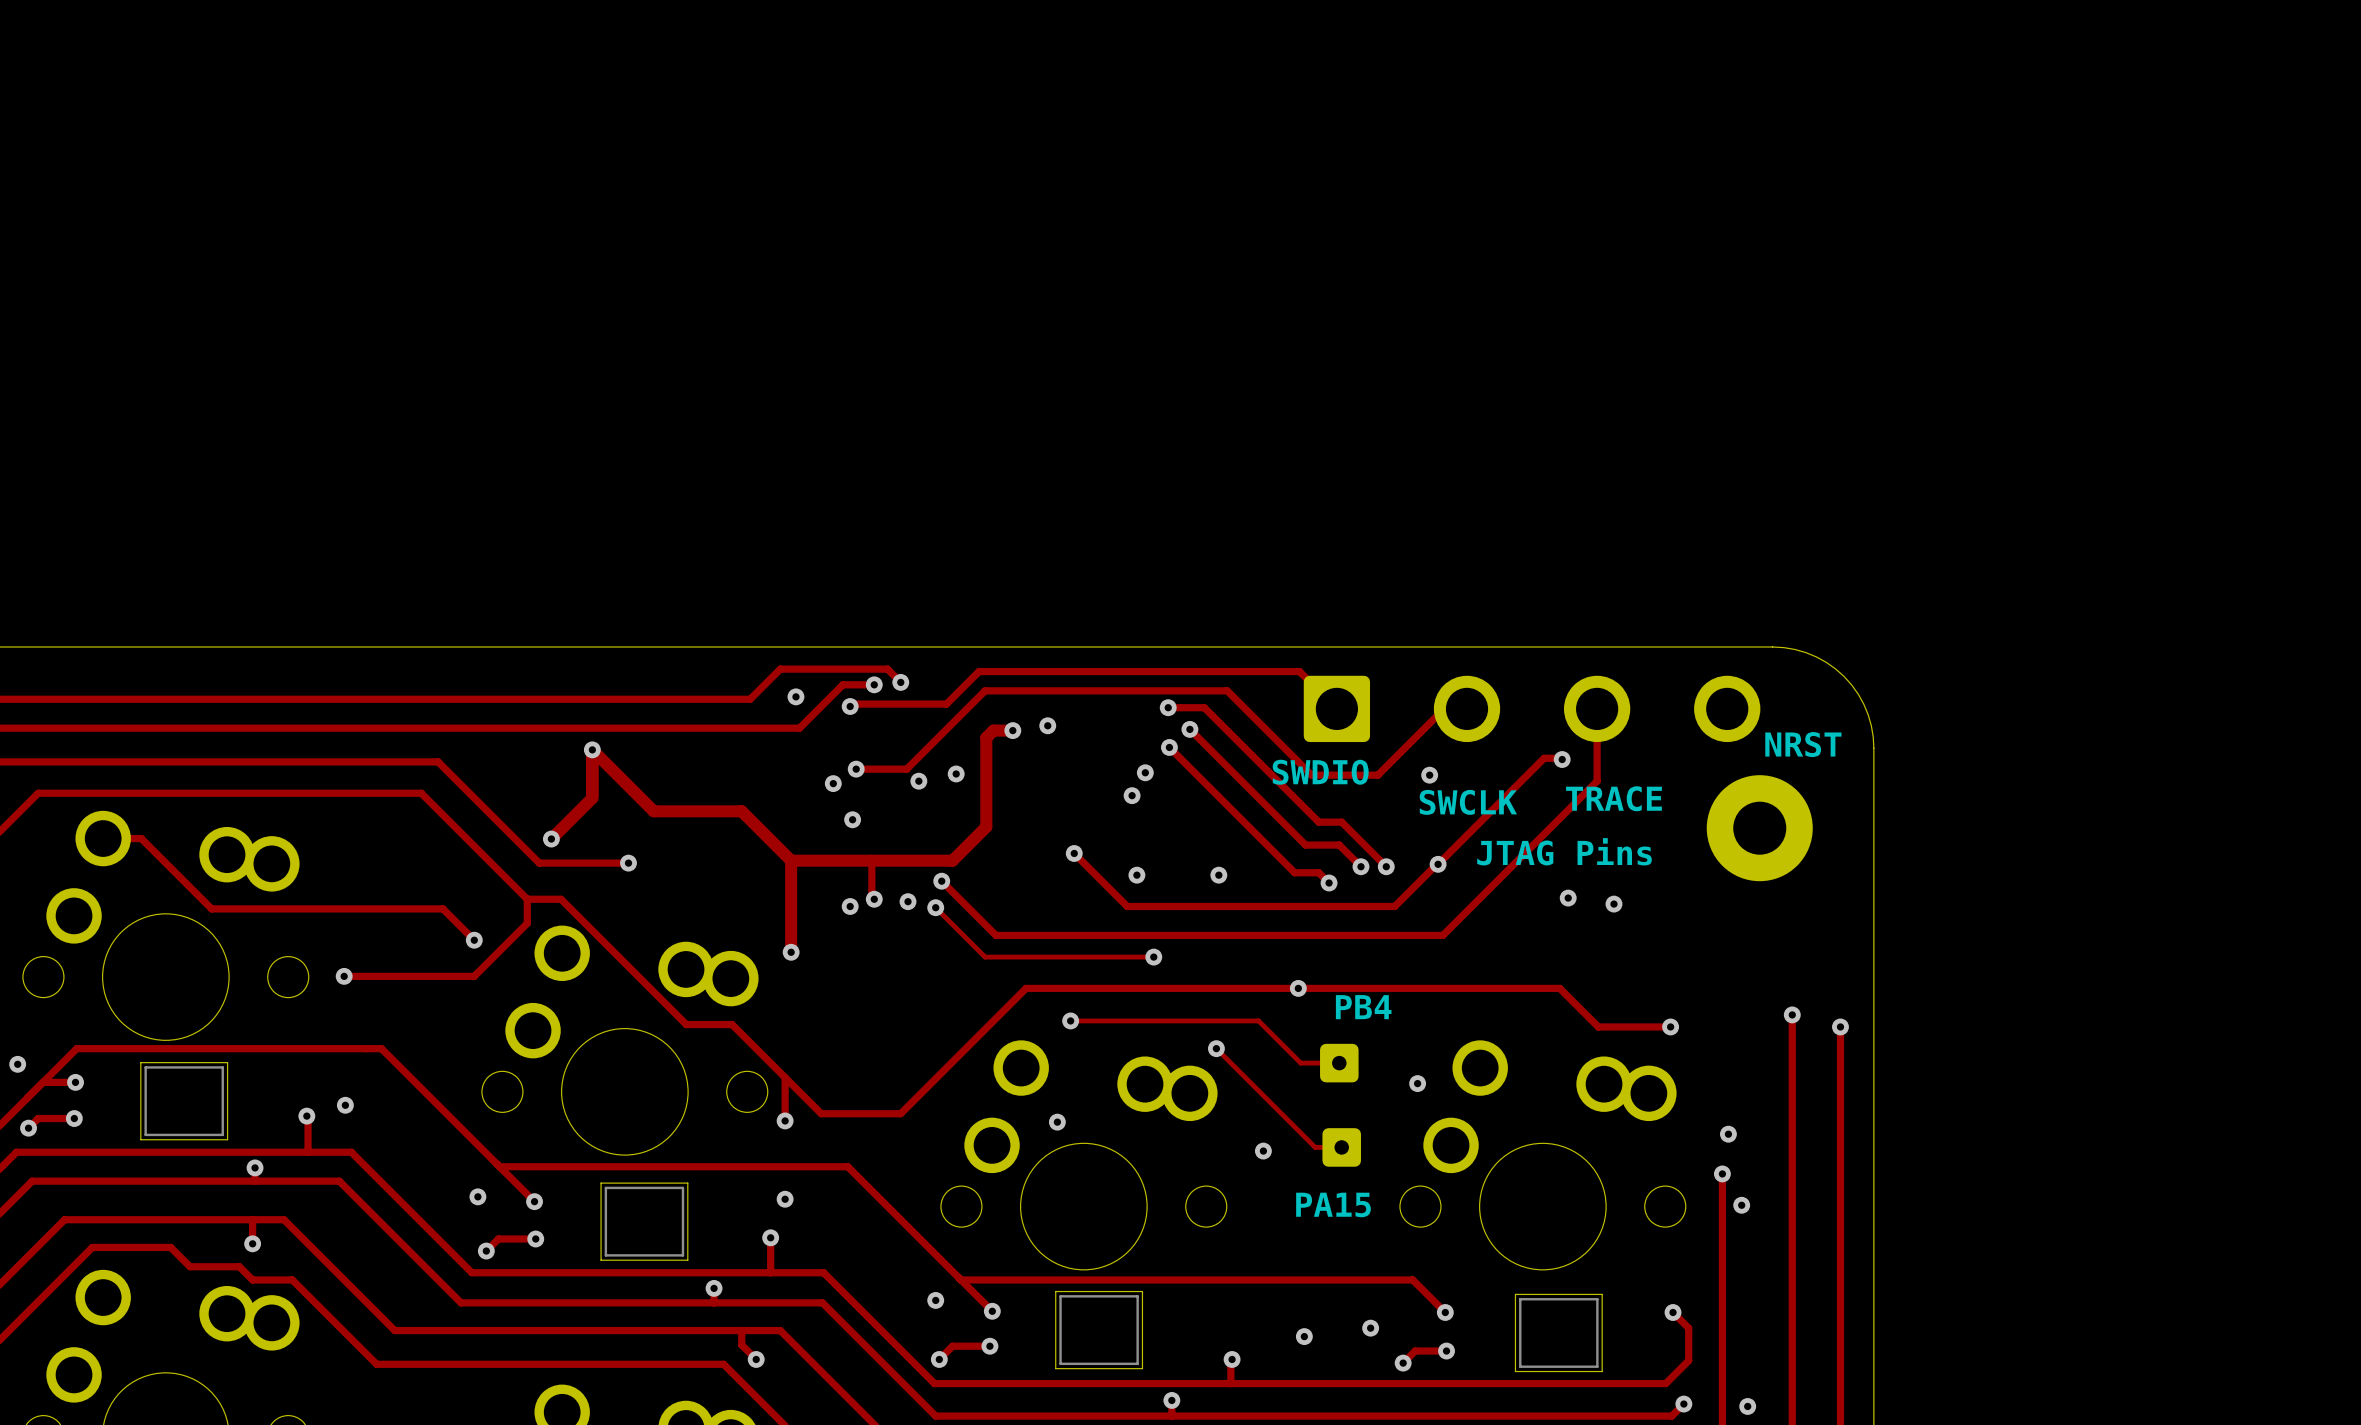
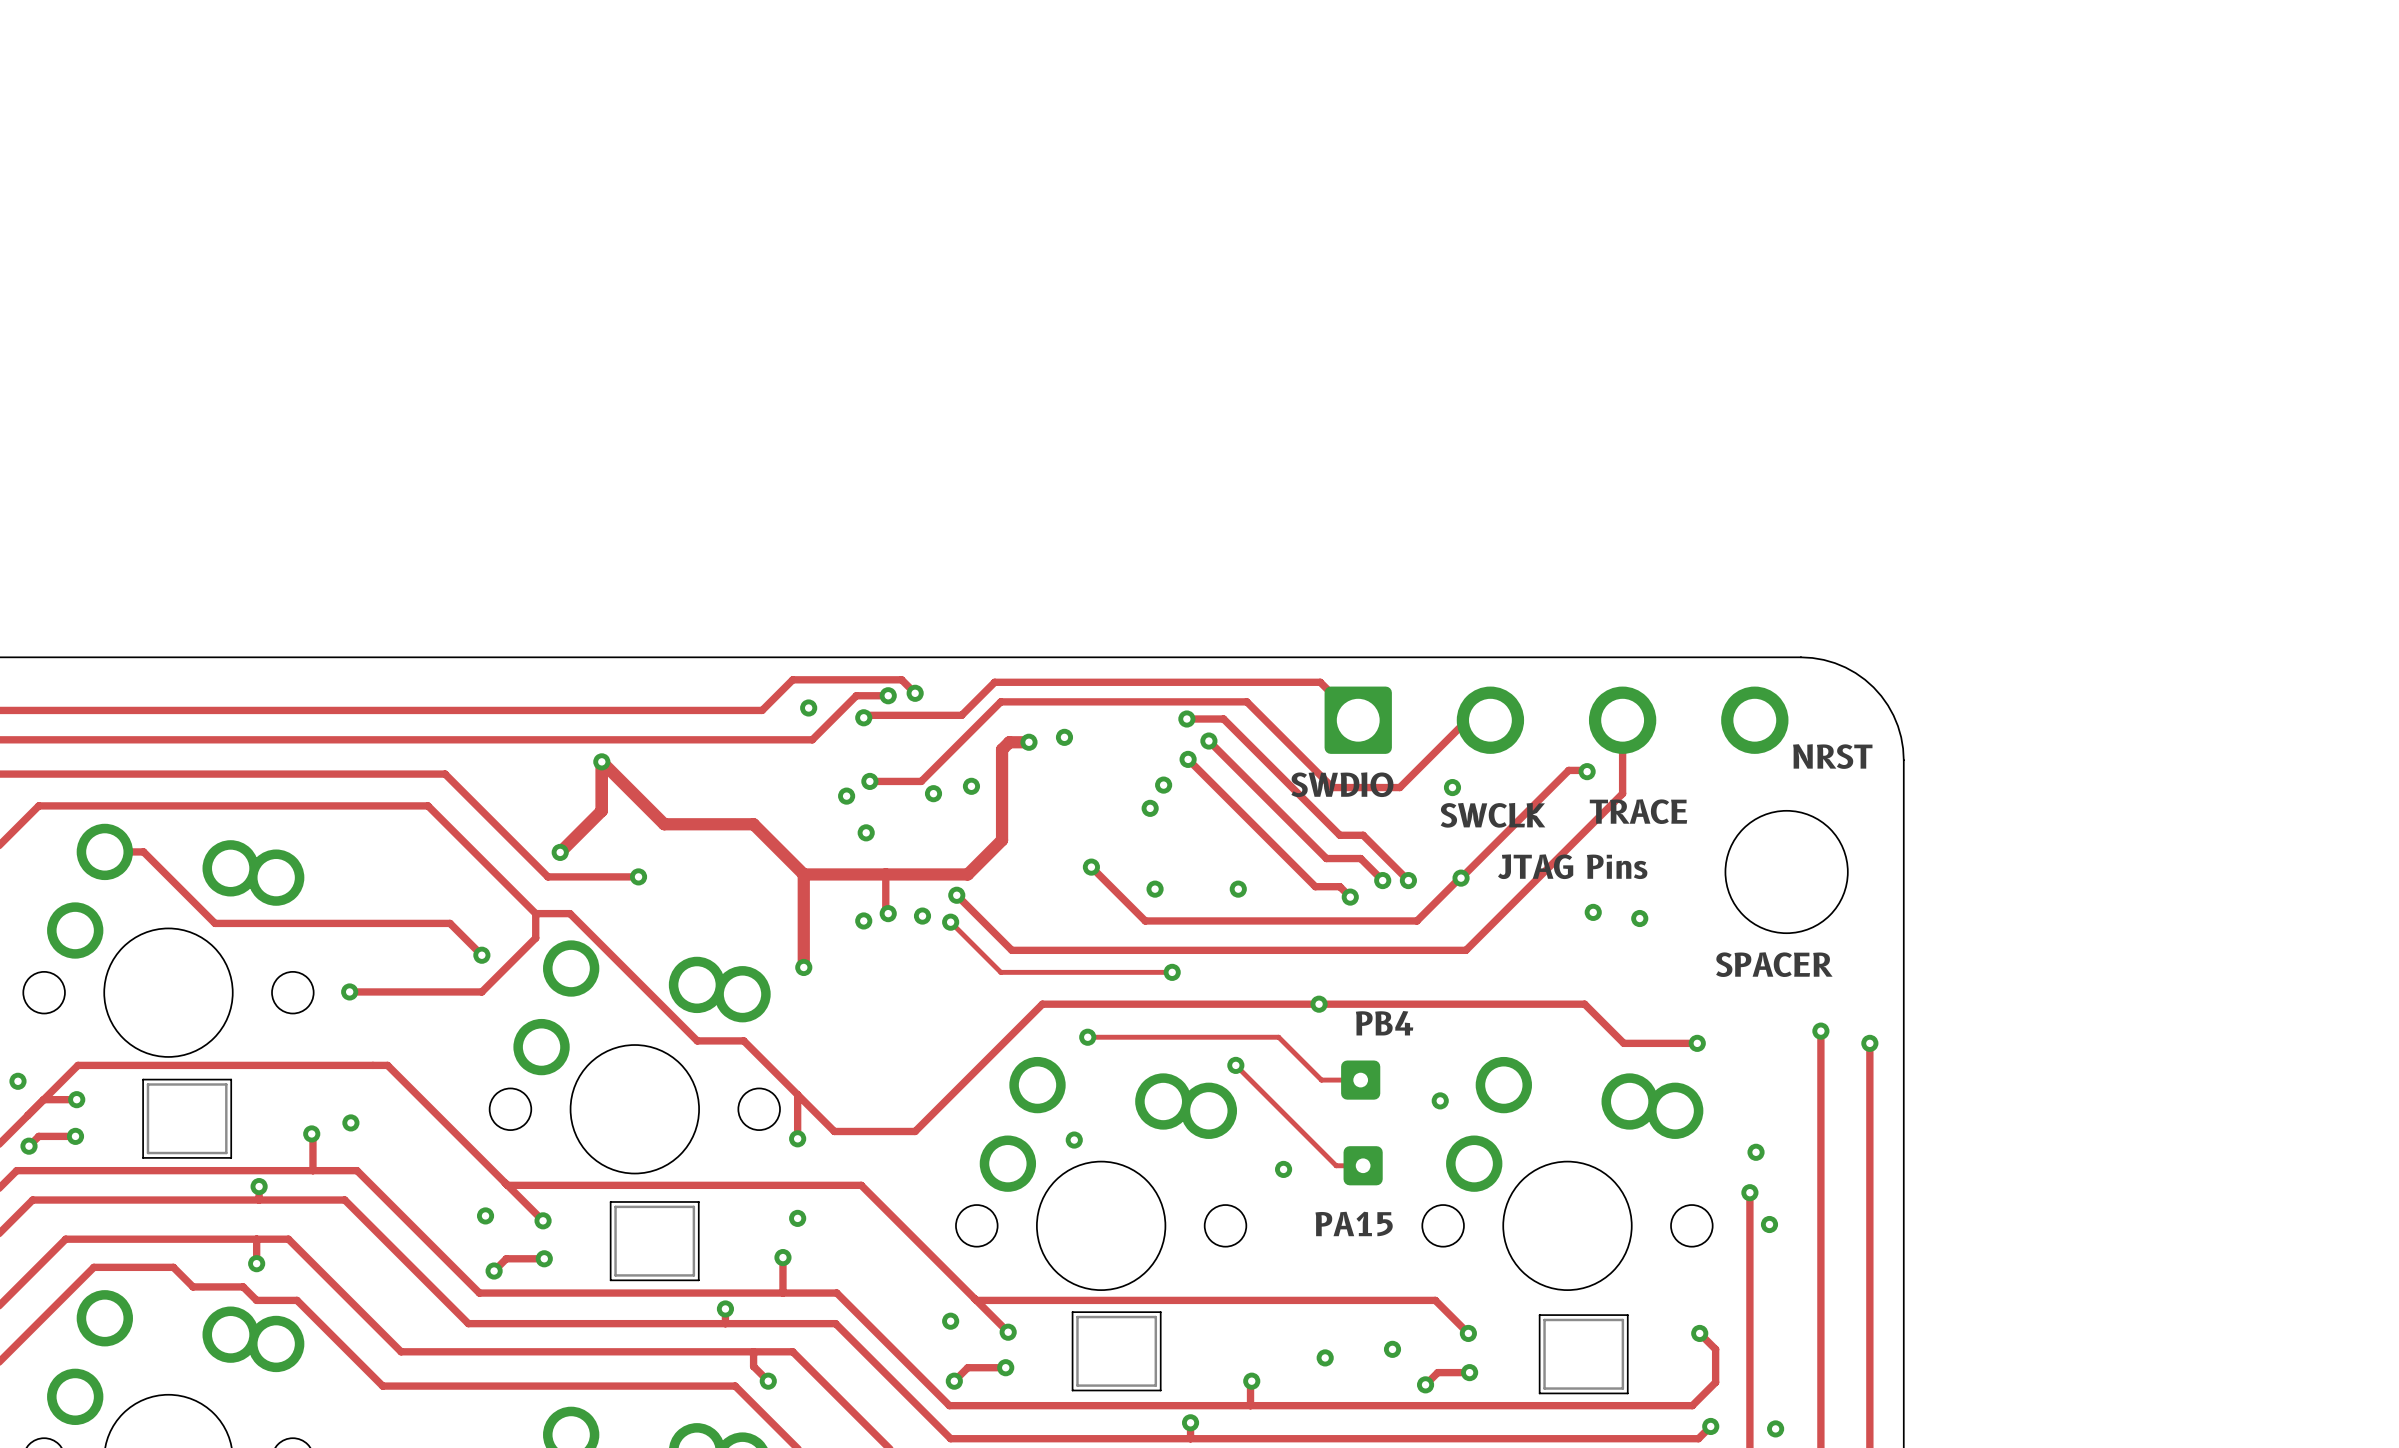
round board edge: none -> [1724, 810, 1849, 934]
part: (1759, 828) -> none
text: none -> SPACER (1774, 964)

